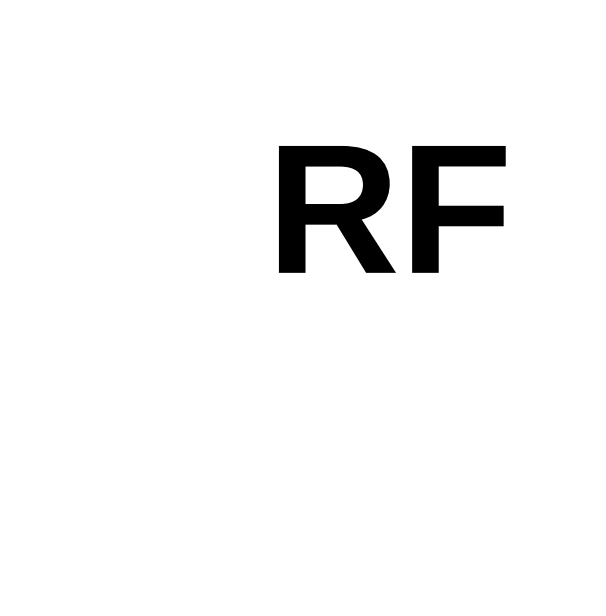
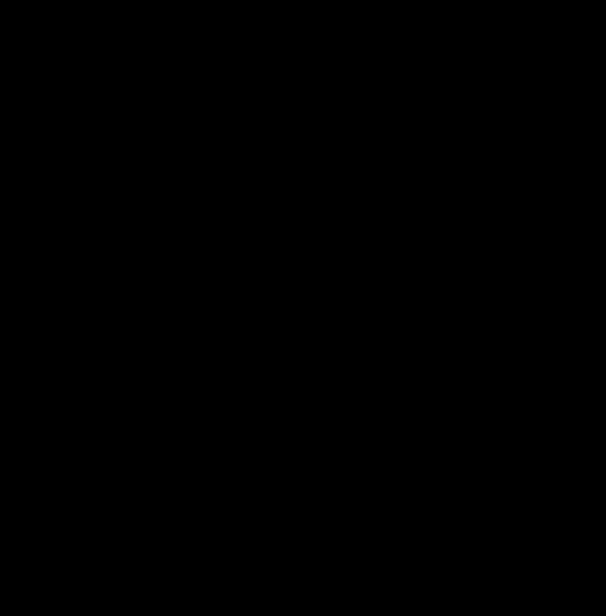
text: RF (392, 209) -> none

